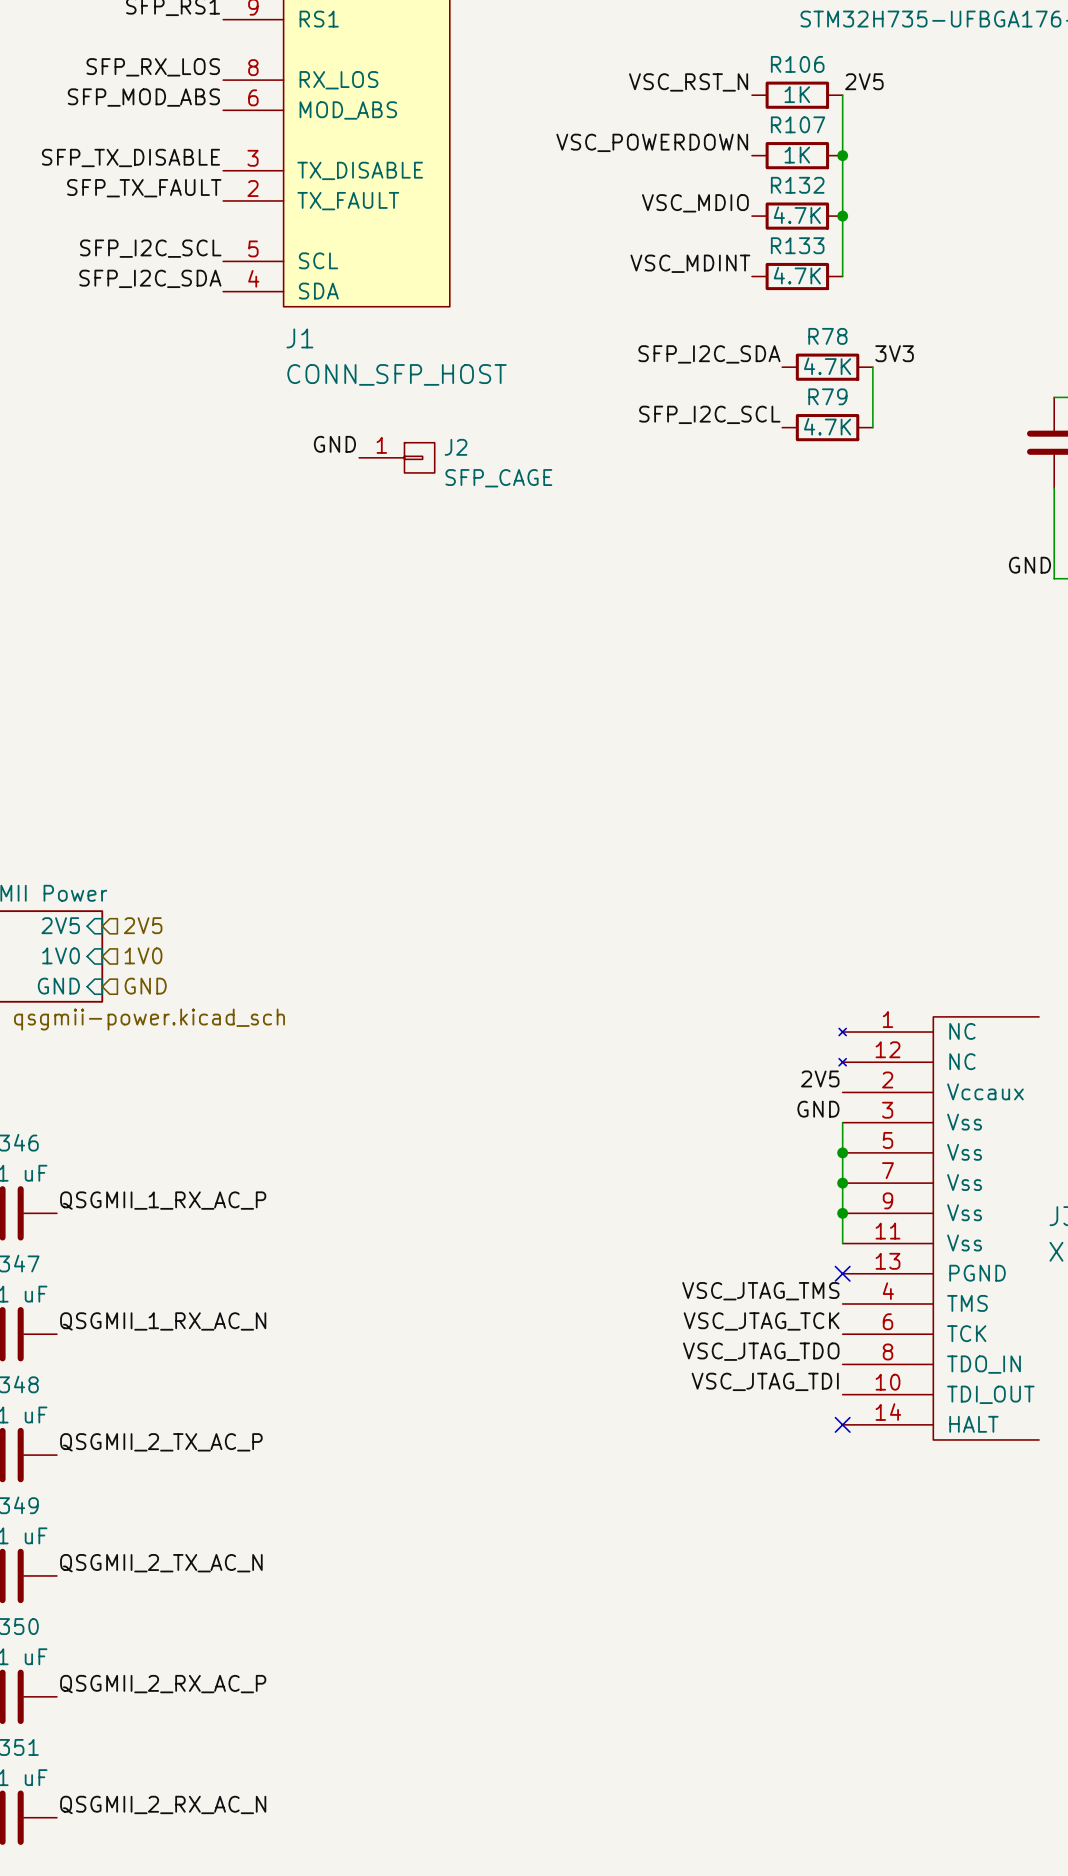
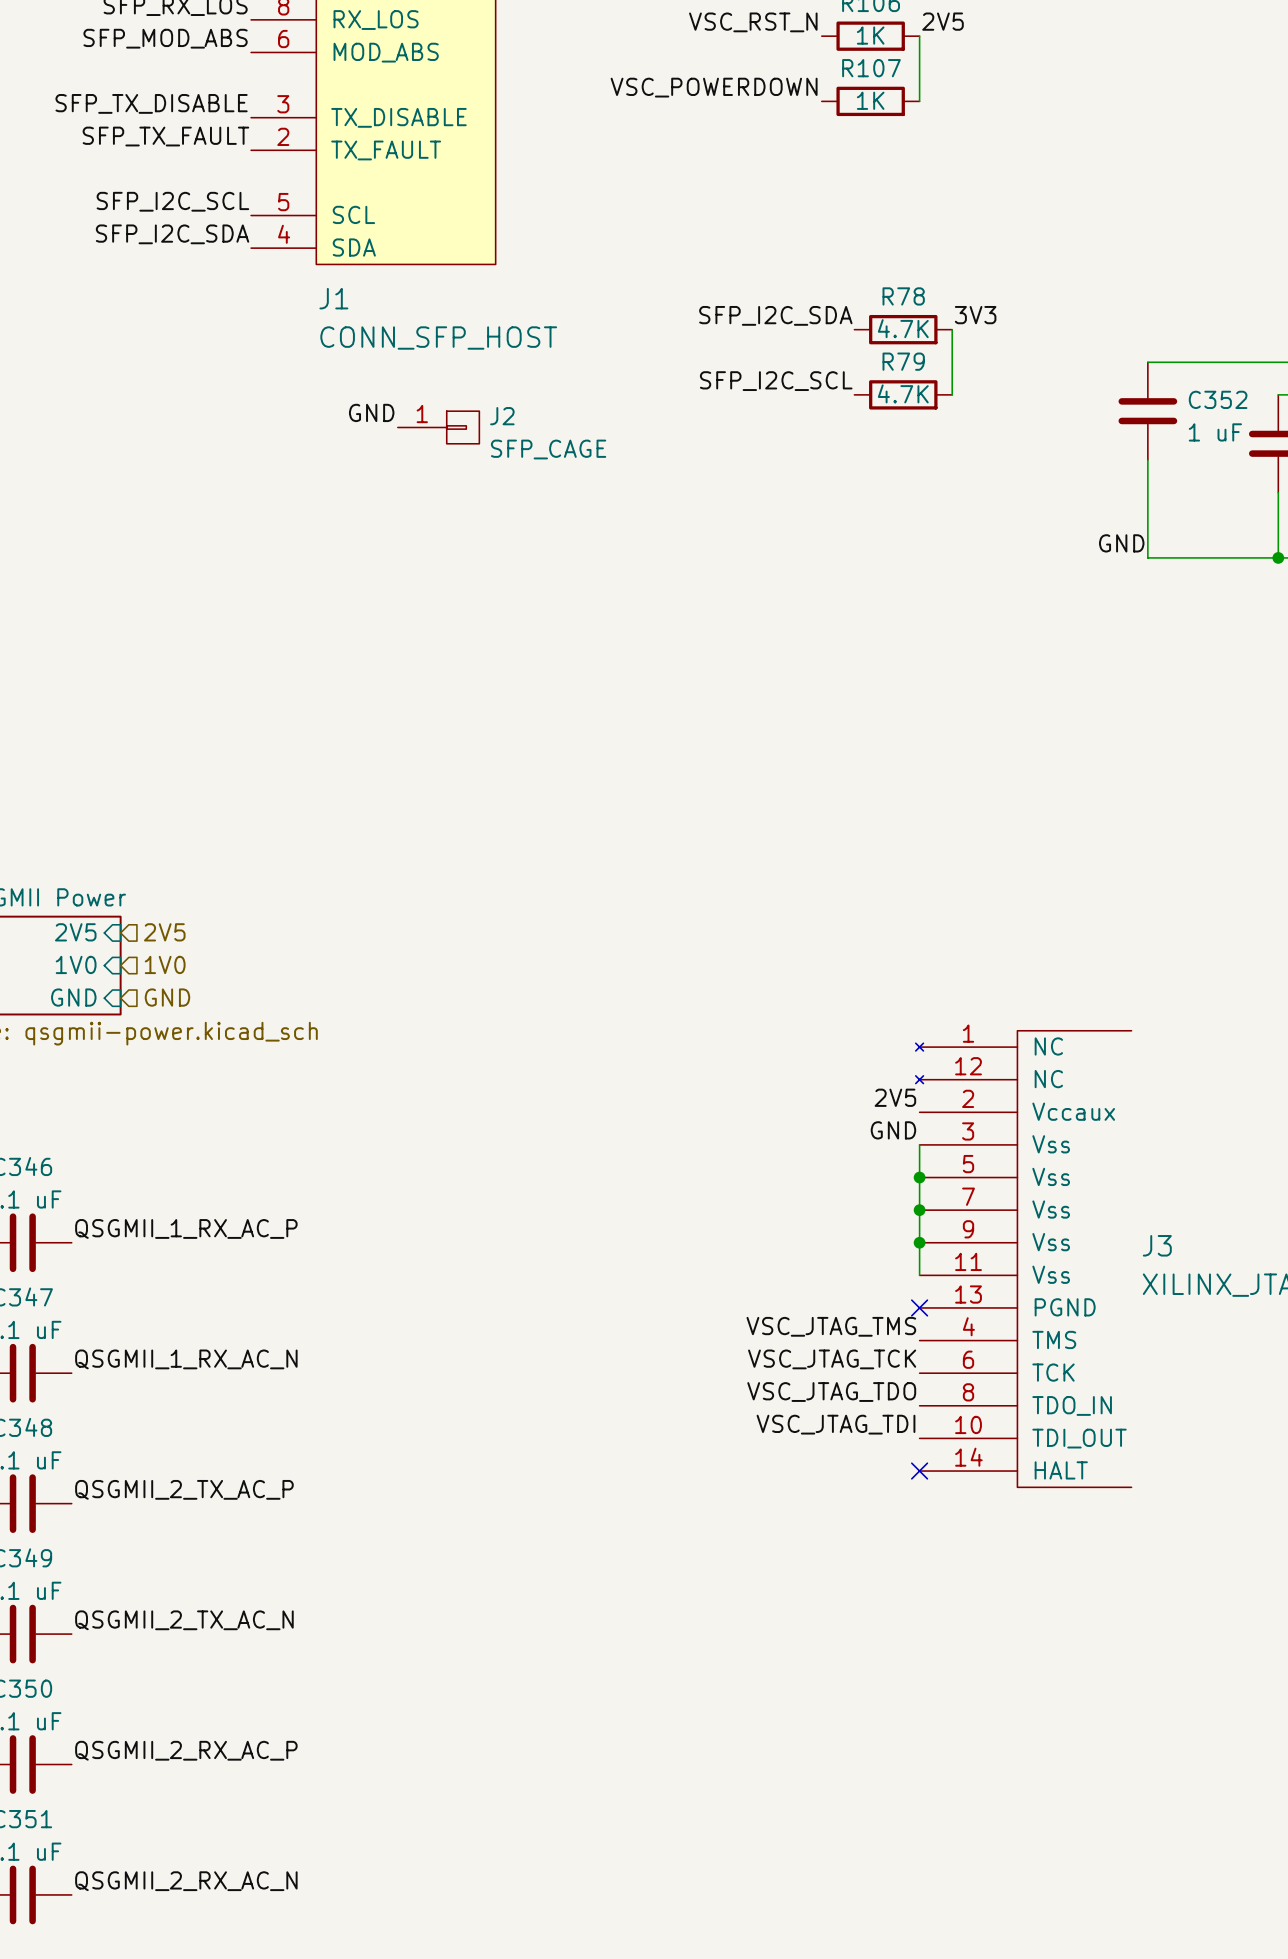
wire: (842, 155) (842, 276) -> none
junction: (842, 155) -> none
label: VSC_MDIO (695, 203) -> none
R132: 4.7K (797, 216) -> none
junction: (842, 216) -> none
label: VSC_MDINT (690, 263) -> none
R133: 4.7K (797, 276) -> none

